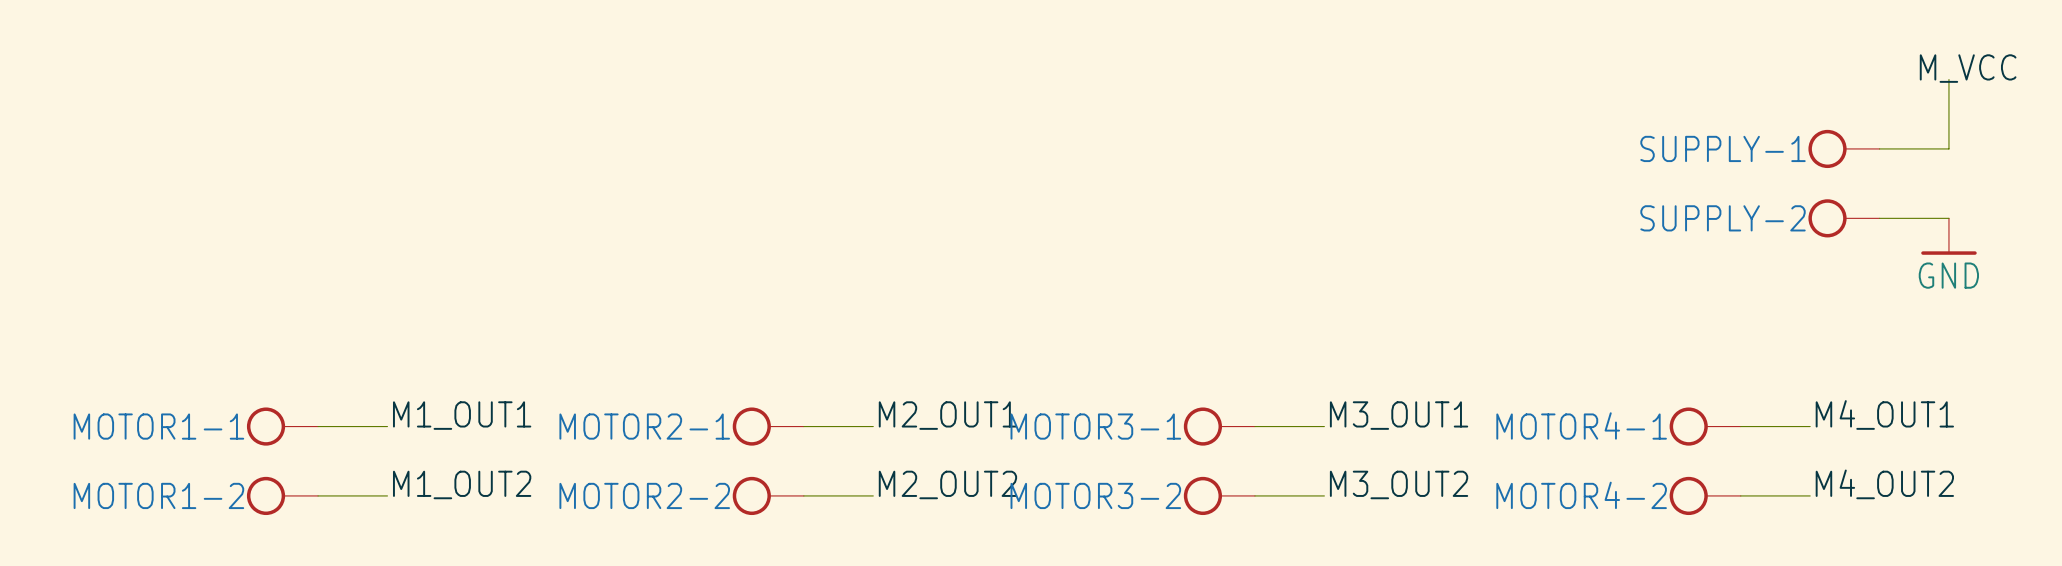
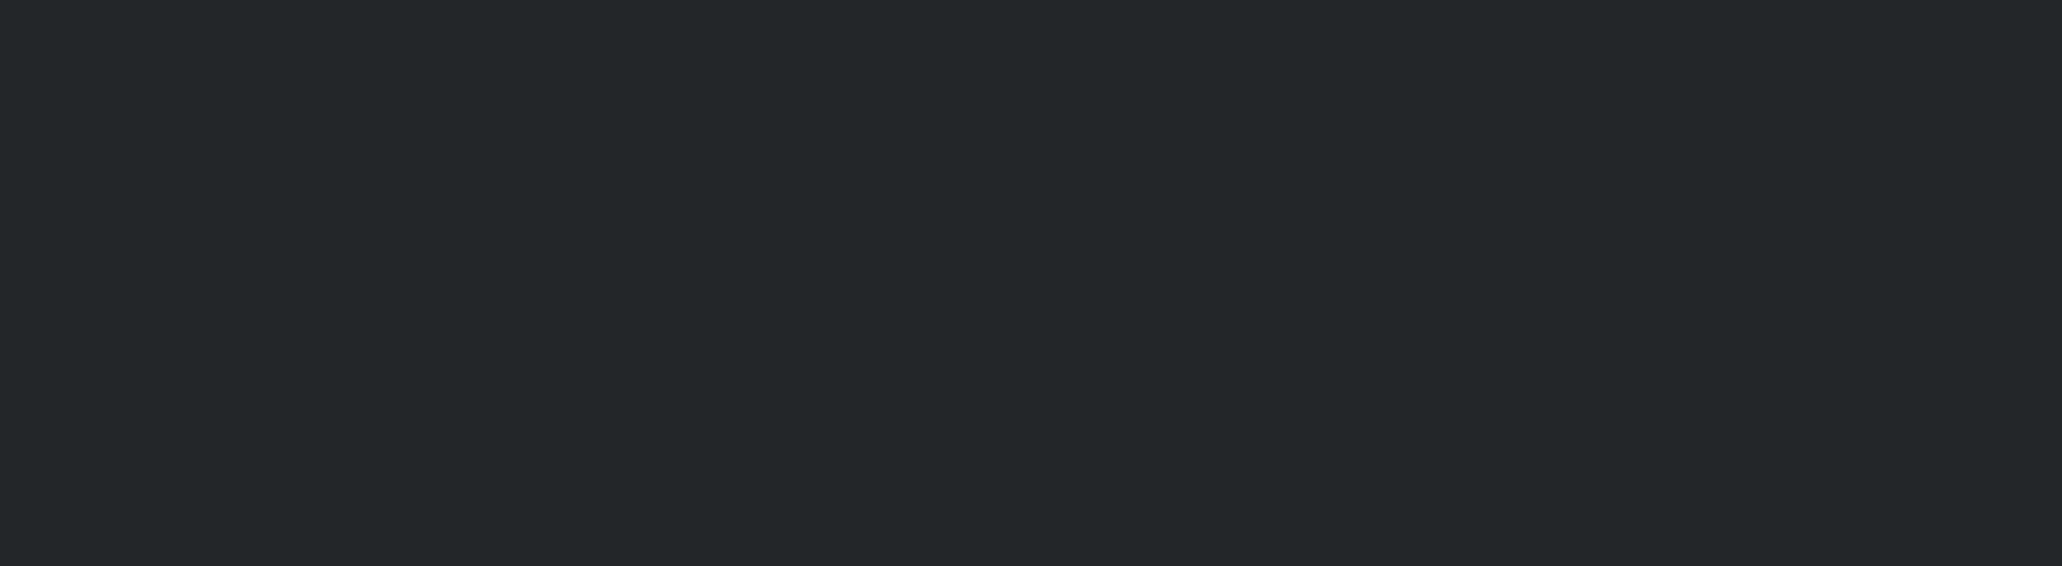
label: M_VCC (1968, 68) -> none
wire: (1948, 79) (1948, 148) (1879, 148) -> none
SUPPLY-1: (1844, 148) -> none
SUPPLY-2: (1844, 218) -> none
wire: (1879, 218) (1948, 218) -> none
power symbol: GND (1948, 236) -> none
label: M4_OUT1 (1884, 414) -> none
label: M1_OUT1 (462, 415) -> none
label: M2_OUT1 (947, 415) -> none
label: M3_OUT1 (1399, 415) -> none
MOTOR1-1: (282, 426) -> none
wire: (318, 426) (387, 426) -> none
MOTOR2-1: (768, 426) -> none
wire: (803, 426) (873, 426) -> none
MOTOR3-1: (1219, 426) -> none
wire: (1254, 426) (1324, 426) -> none
MOTOR4-1: (1705, 426) -> none
wire: (1740, 426) (1810, 426) -> none
label: M1_OUT2 (462, 484) -> none
label: M2_OUT2 (947, 484) -> none
label: M3_OUT2 (1399, 484) -> none
label: M4_OUT2 (1884, 484) -> none
MOTOR1-2: (282, 495) -> none
wire: (318, 495) (387, 495) -> none
MOTOR2-2: (768, 495) -> none
wire: (803, 495) (873, 495) -> none
MOTOR3-2: (1219, 495) -> none
wire: (1254, 495) (1324, 495) -> none
MOTOR4-2: (1705, 495) -> none
wire: (1740, 495) (1810, 495) -> none

